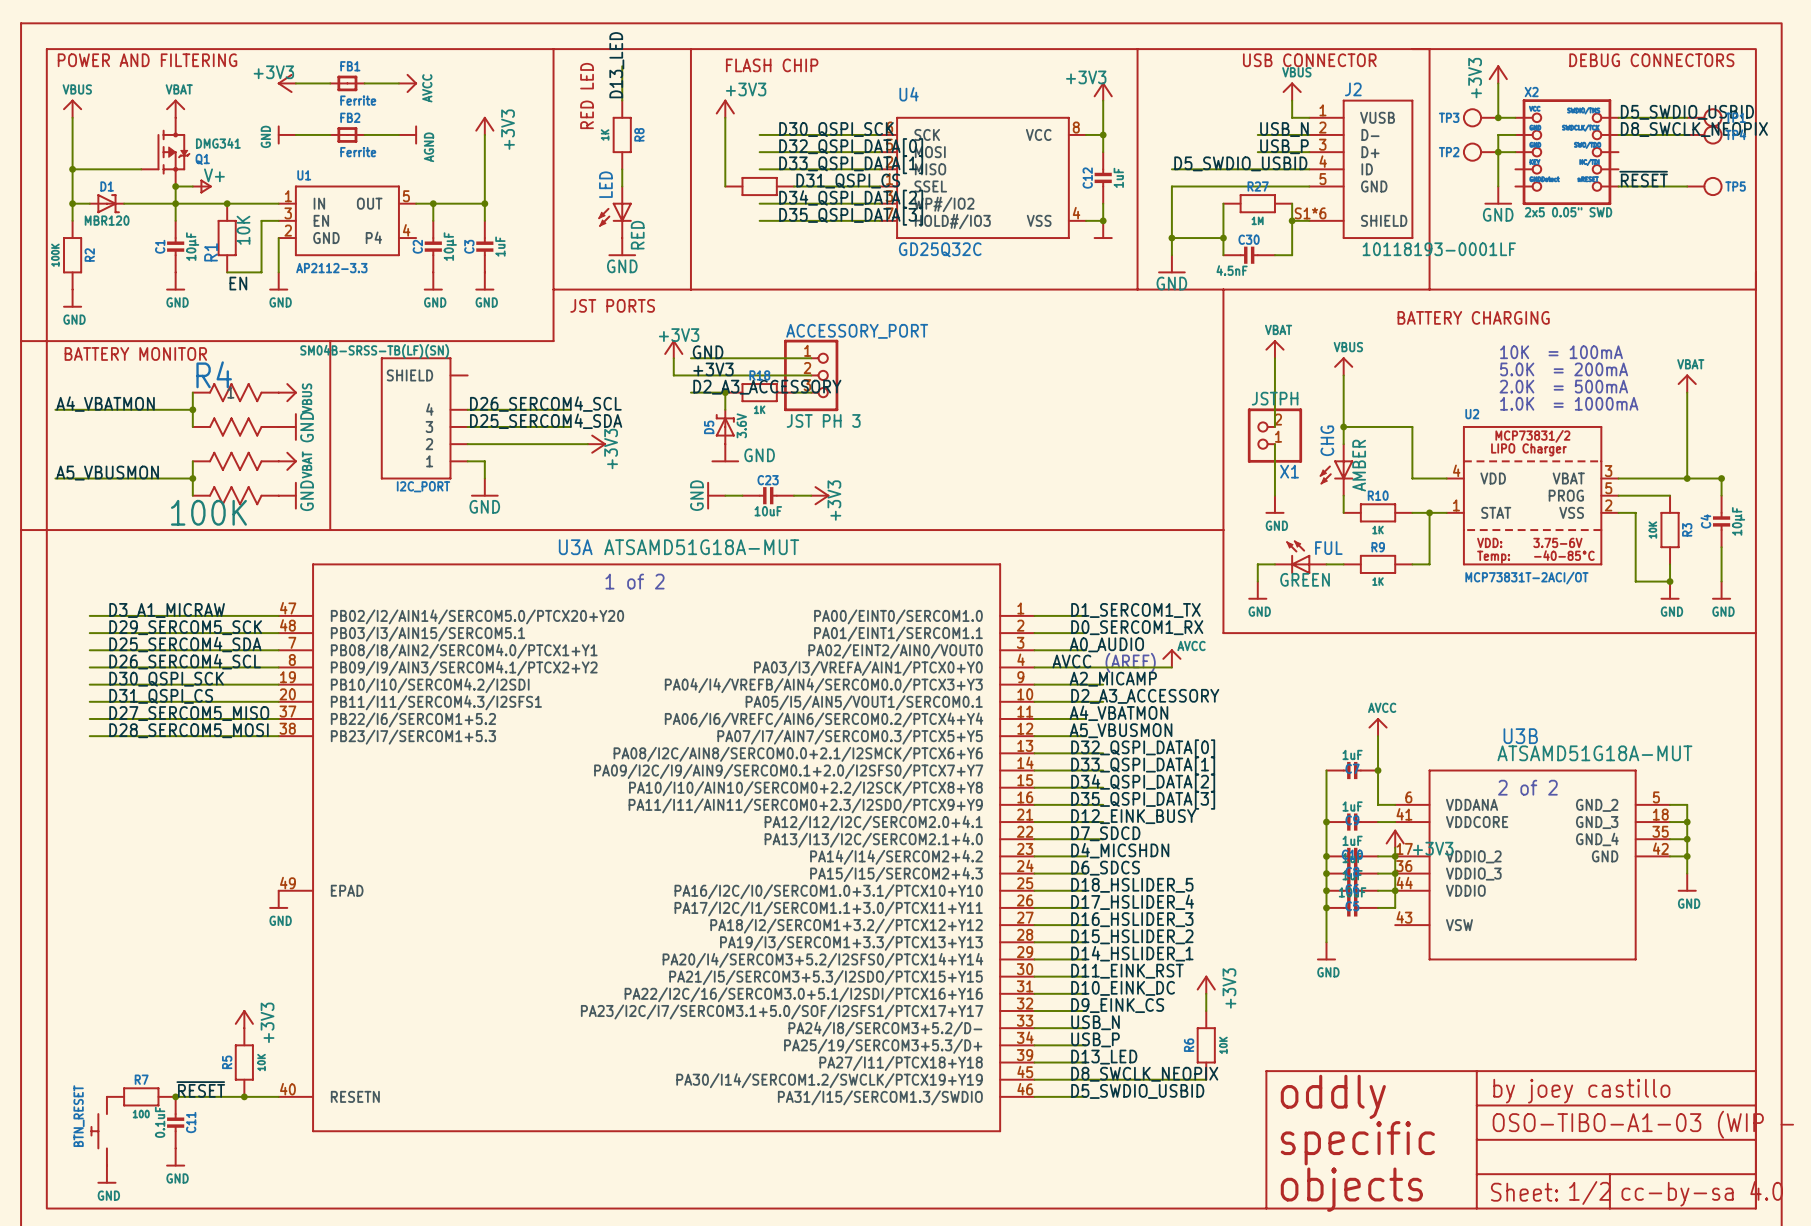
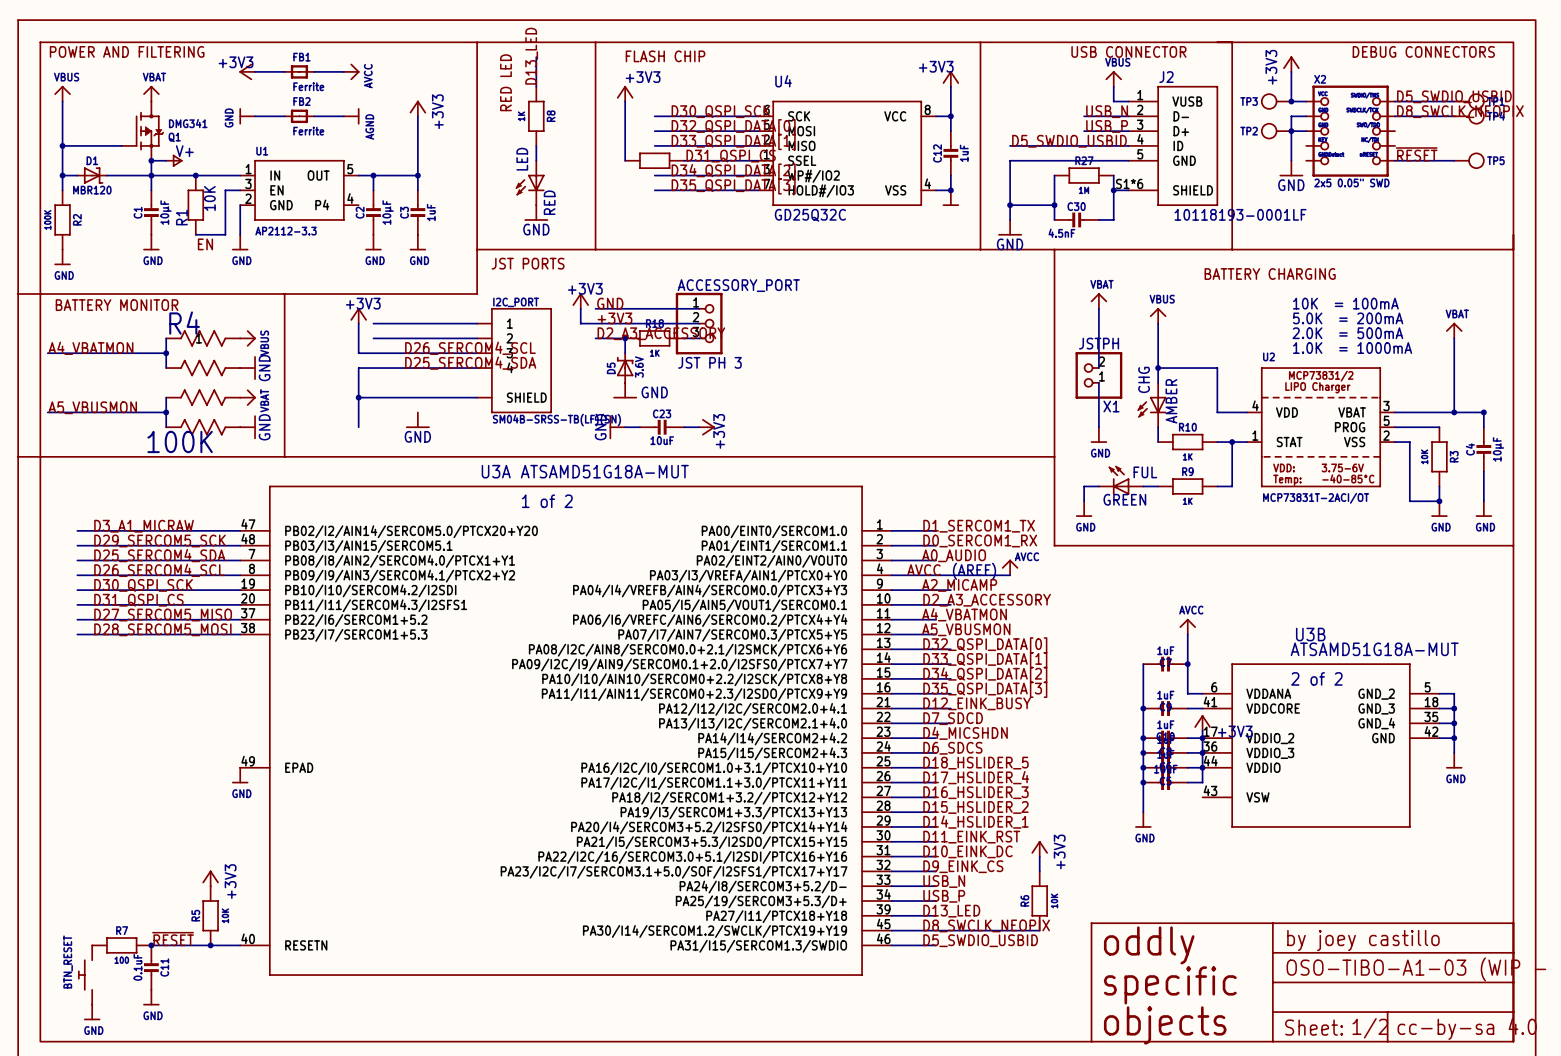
power symbol: none -> +3V3 (358, 315)
wire: none -> (358, 323) (358, 353) (403, 353)
wire: none -> (373, 323) (477, 323)
I2C_PORT rotation: 0° (416, 418) -> 180° (521, 360)
I2C_PORT position: (424, 418) -> (514, 360)
wire: none -> (403, 368) (358, 368) (358, 427)
wire: (467, 444) (587, 444) -> (373, 338) (477, 338)
power symbol: +3V3 (596, 444) -> none
wire: none -> (358, 397) (403, 397)
junction: none -> (358, 397)
wire: (484, 461) (484, 478) -> (417, 397) (477, 397)

